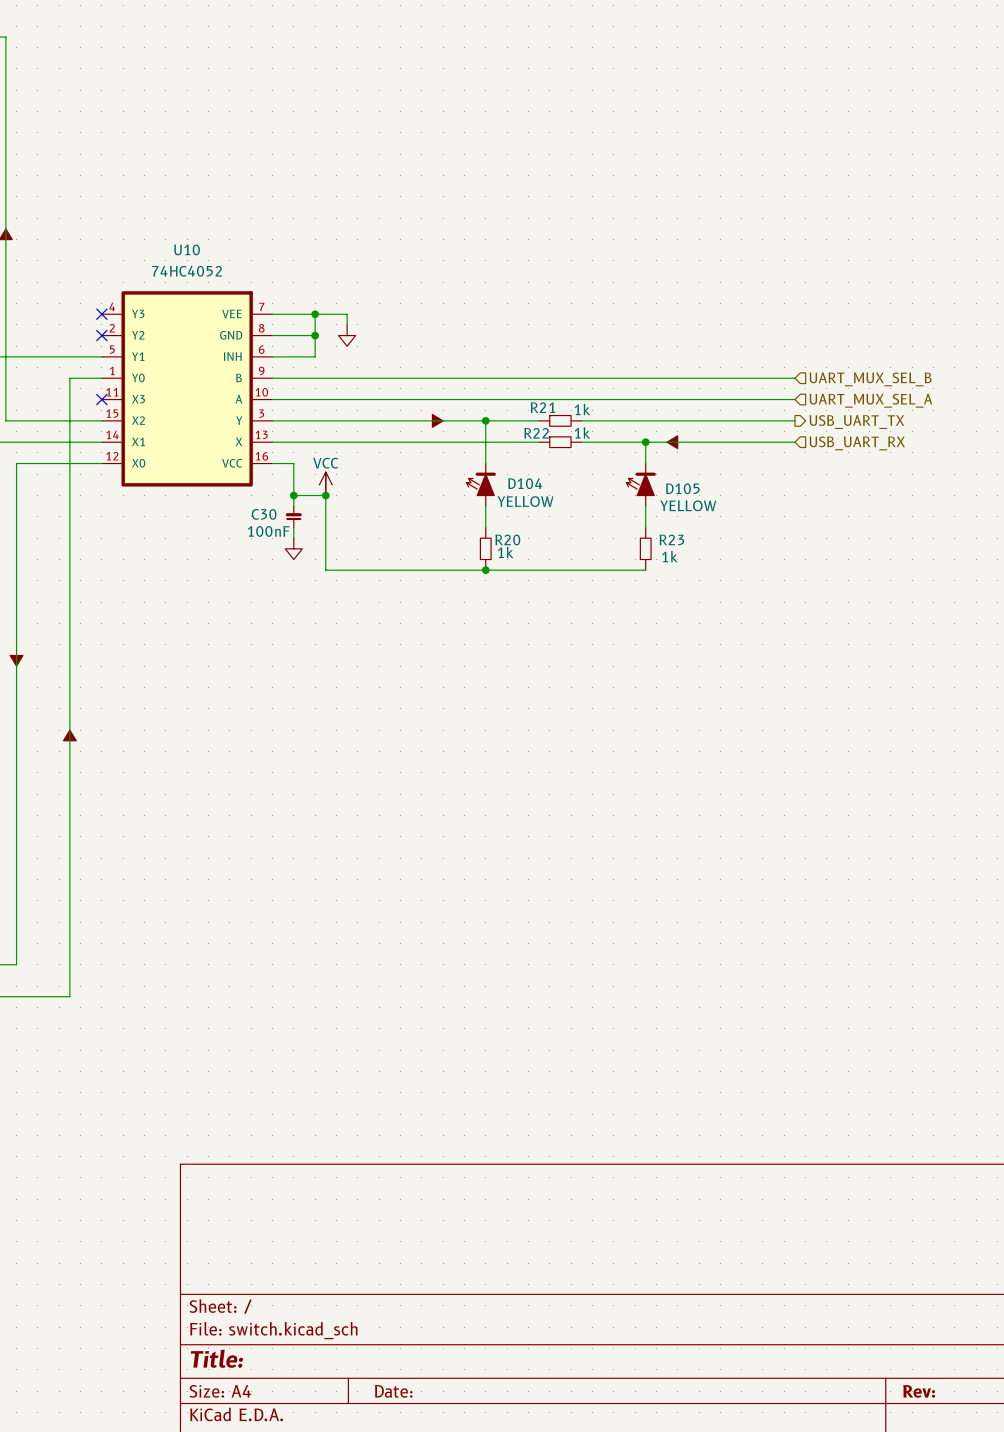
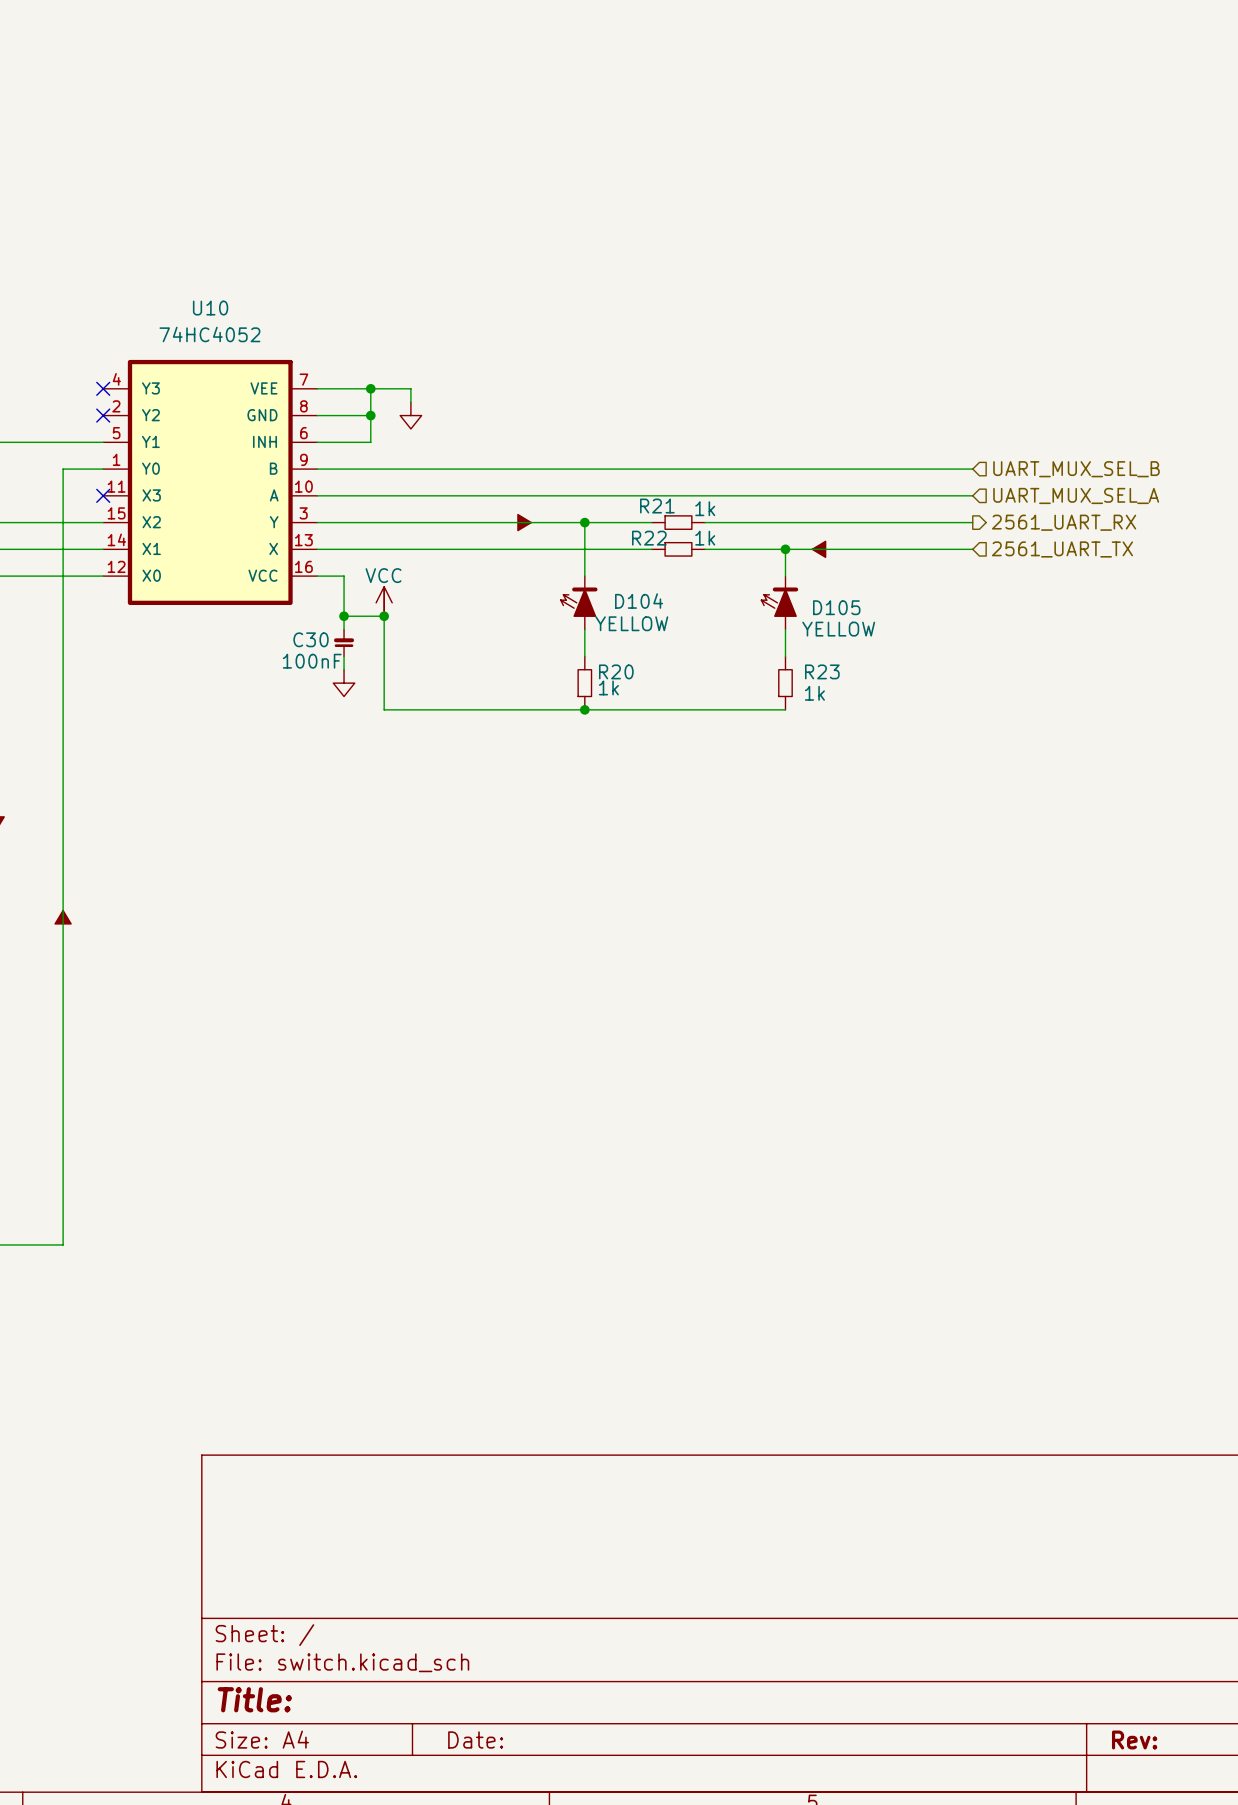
hierarchical label: USB_UART_TX (856, 422) -> 2561_UART_RX (1064, 522)
hierarchical label: USB_UART_RX (857, 443) -> 2561_UART_TX (1062, 549)

